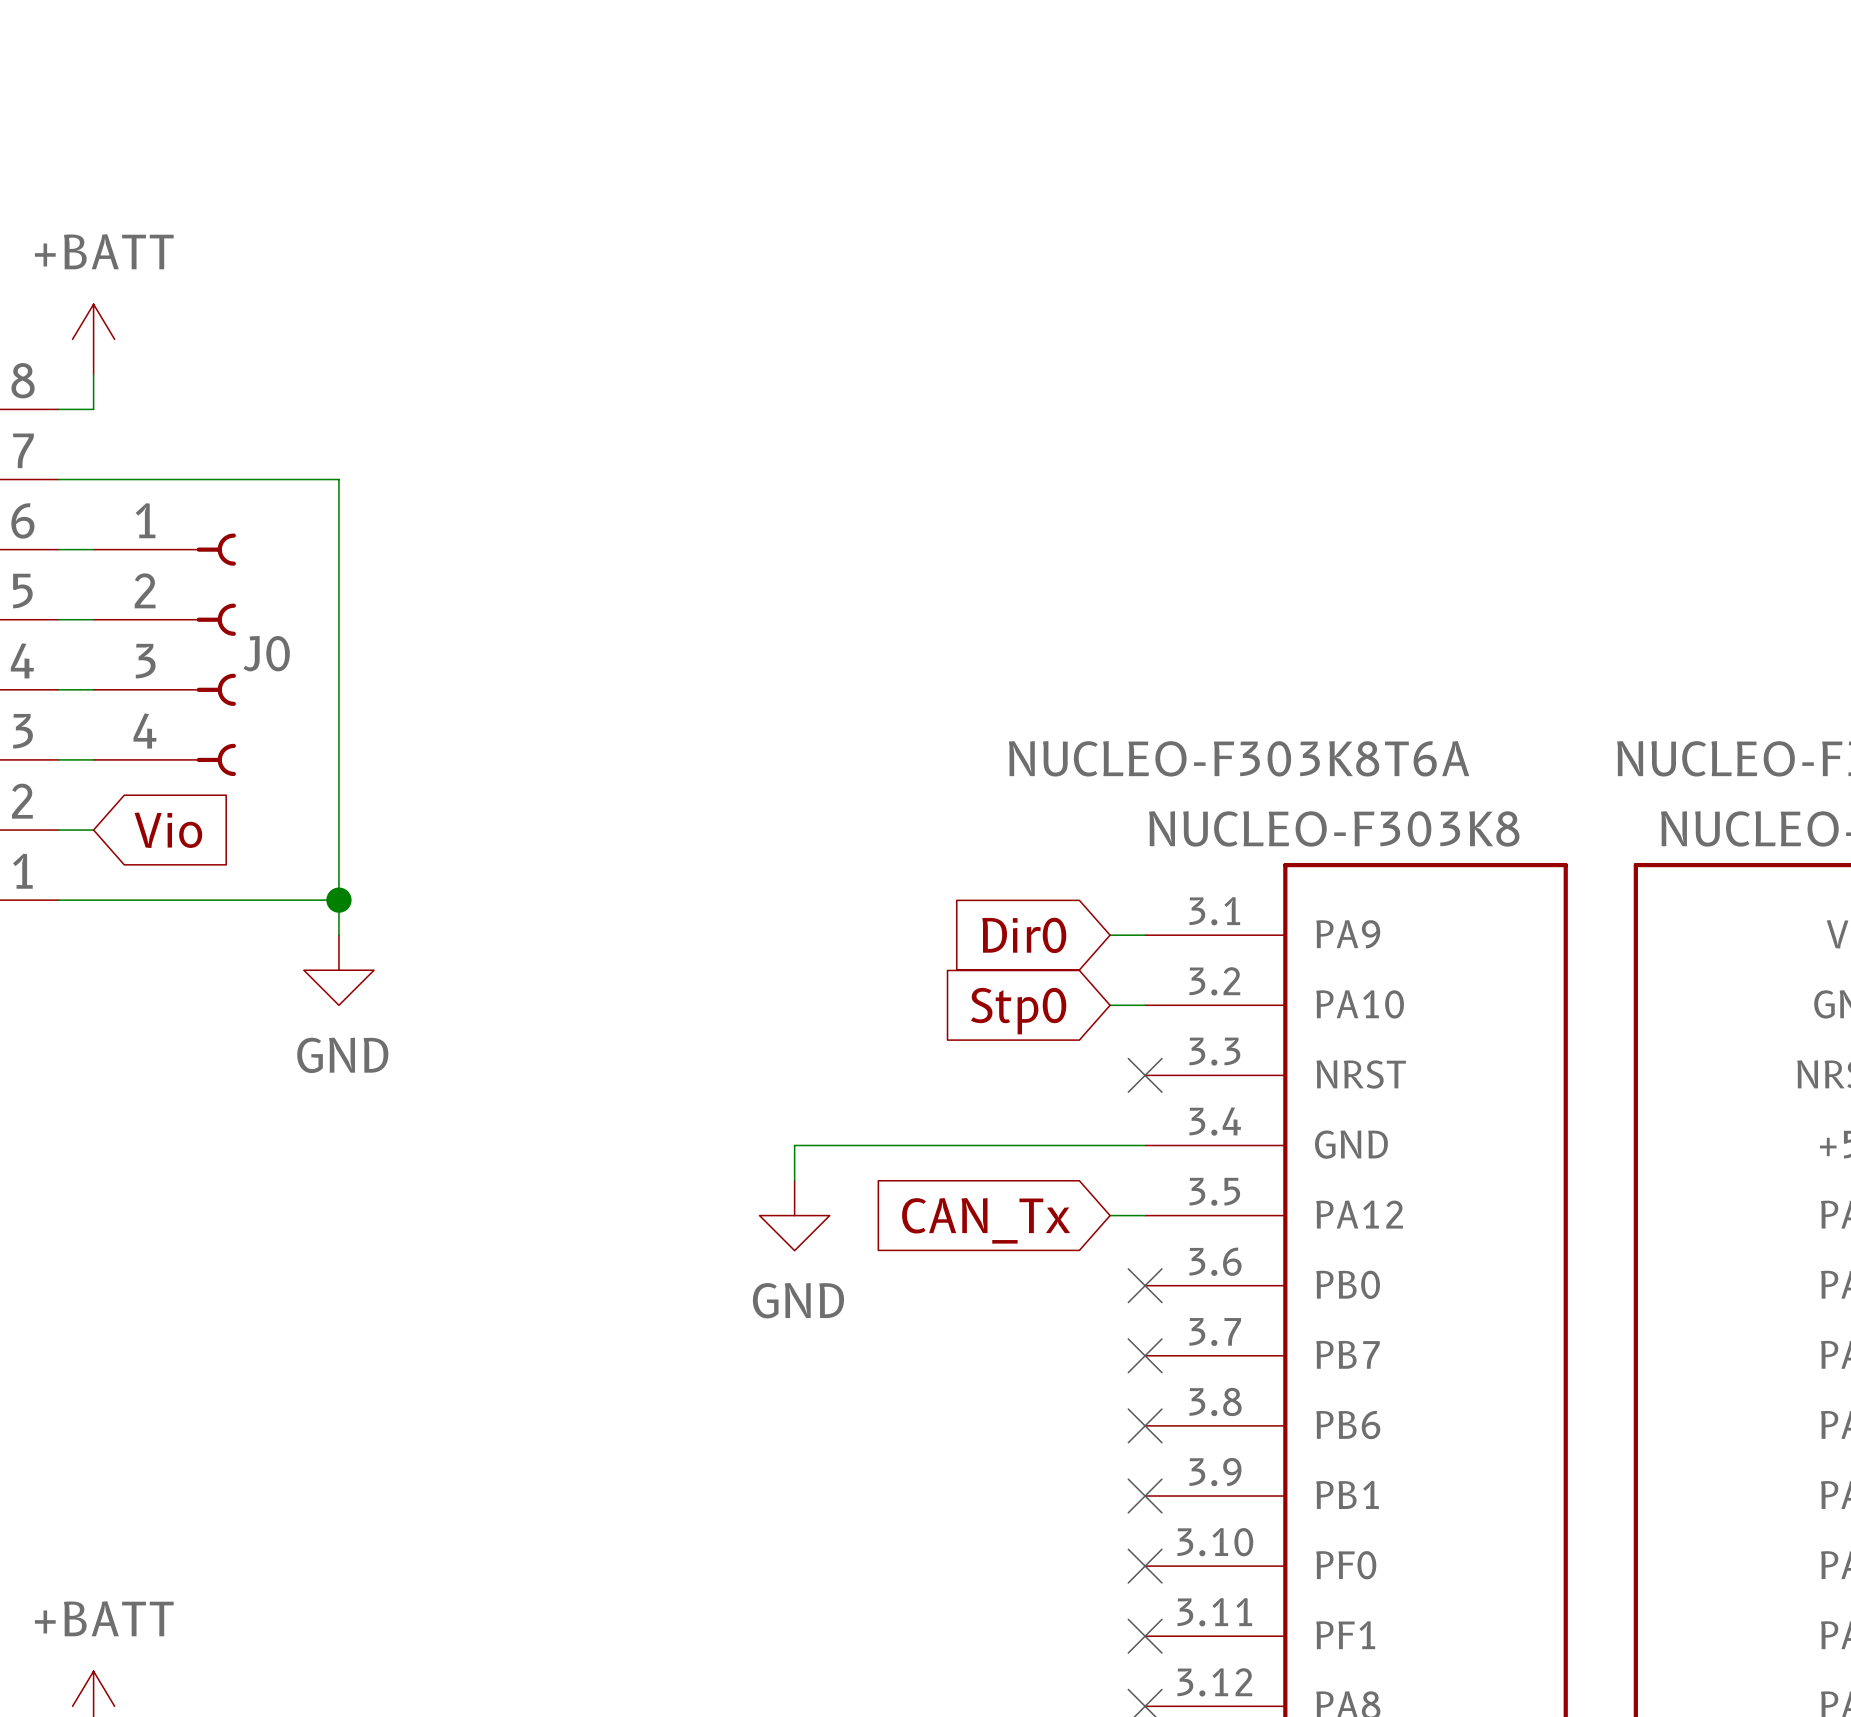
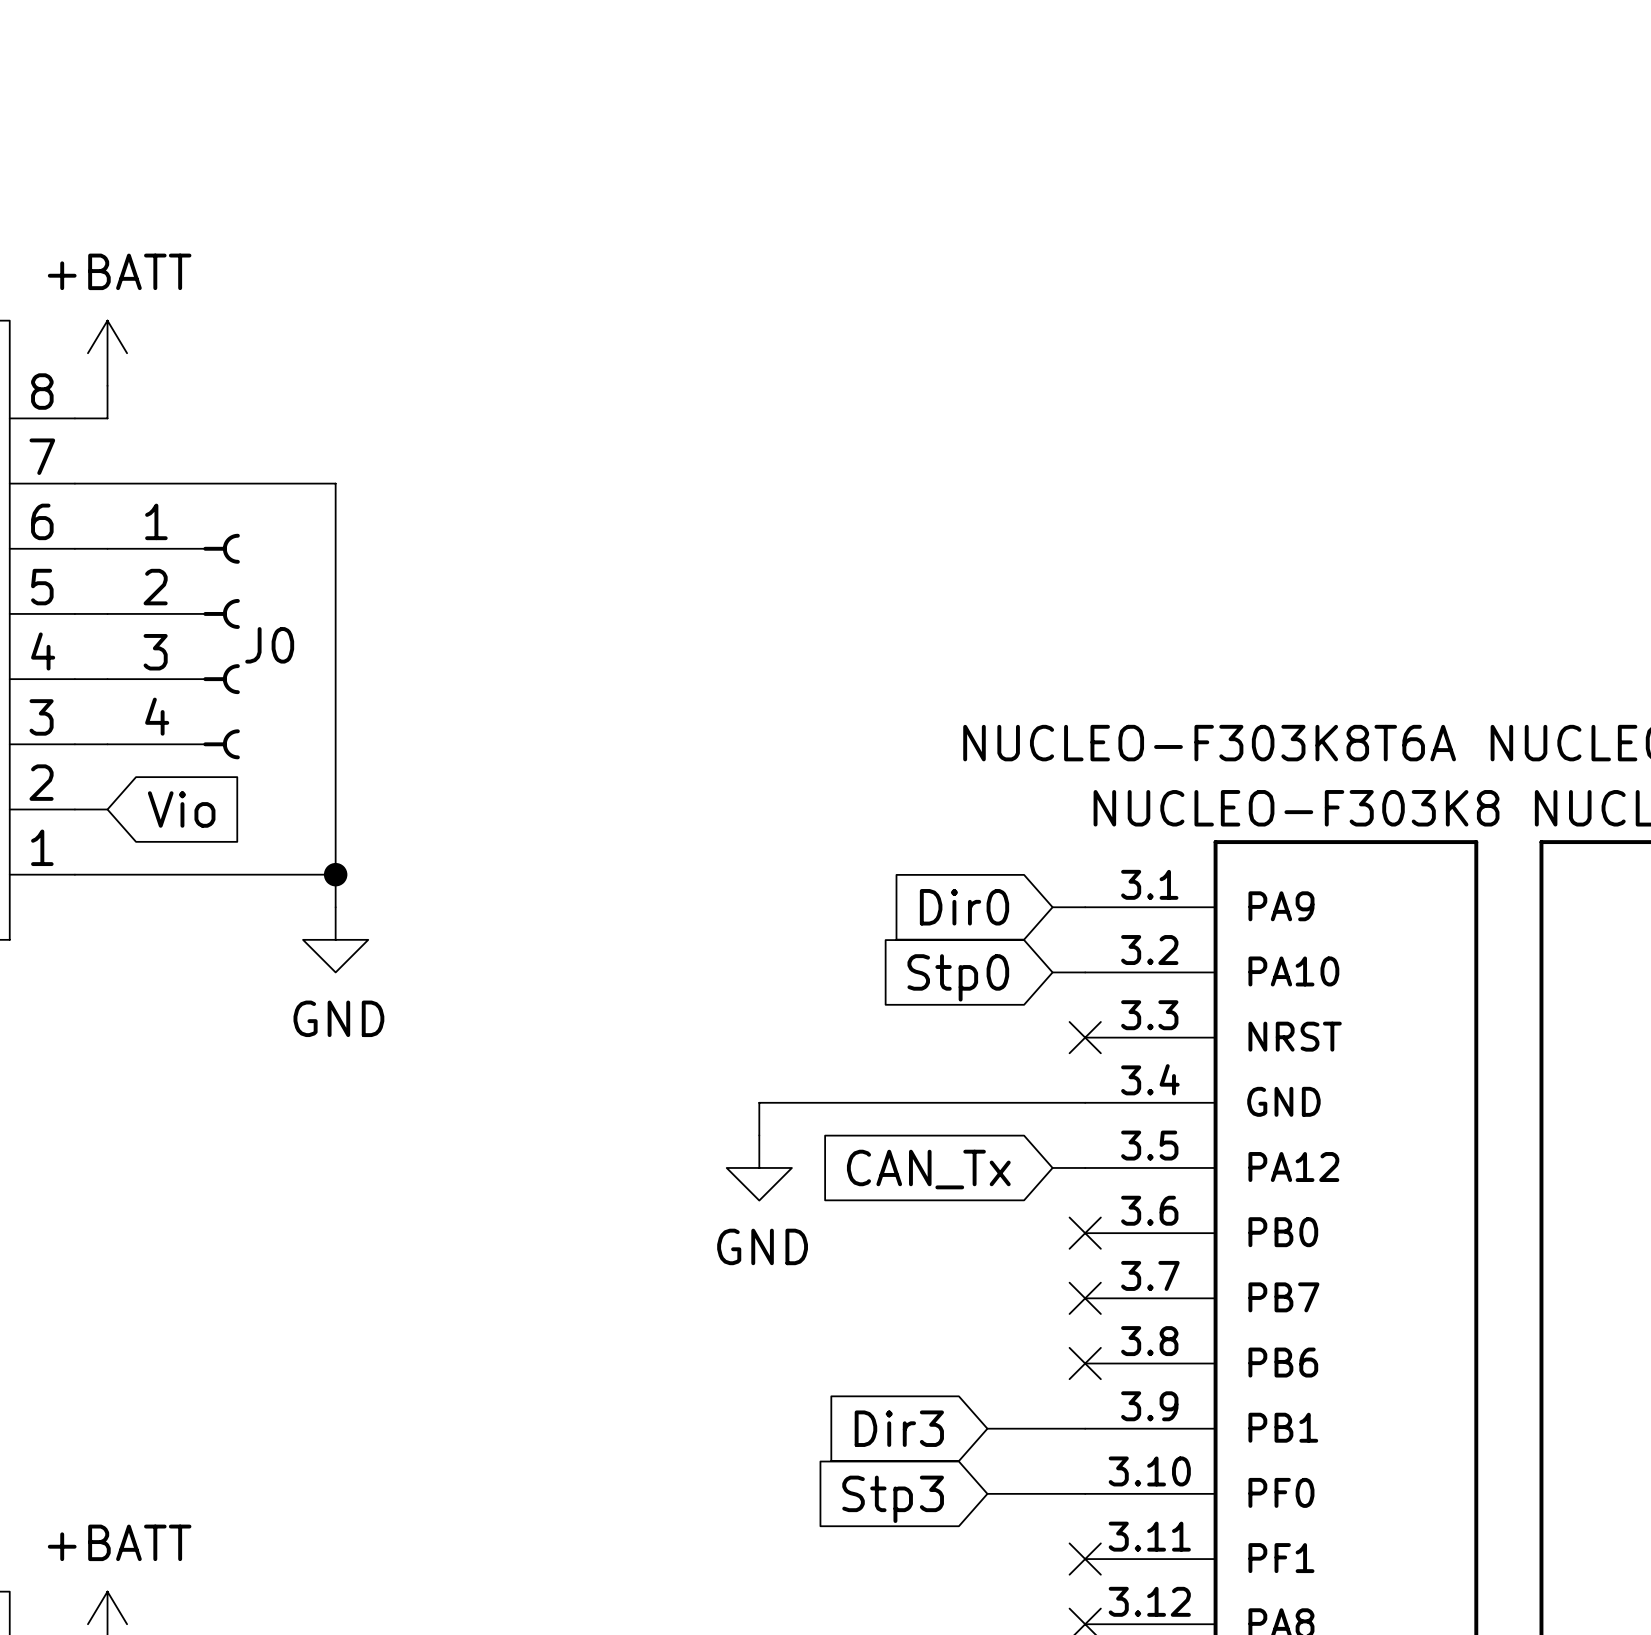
global label: none -> Dir3 (899, 1428)
wire: none -> (987, 1428) (1085, 1428)
no-connect mark: (1145, 1496) -> none
wire: none -> (987, 1493) (1085, 1493)
no-connect mark: (1145, 1566) -> none
global label: none -> Stp3 (893, 1499)

